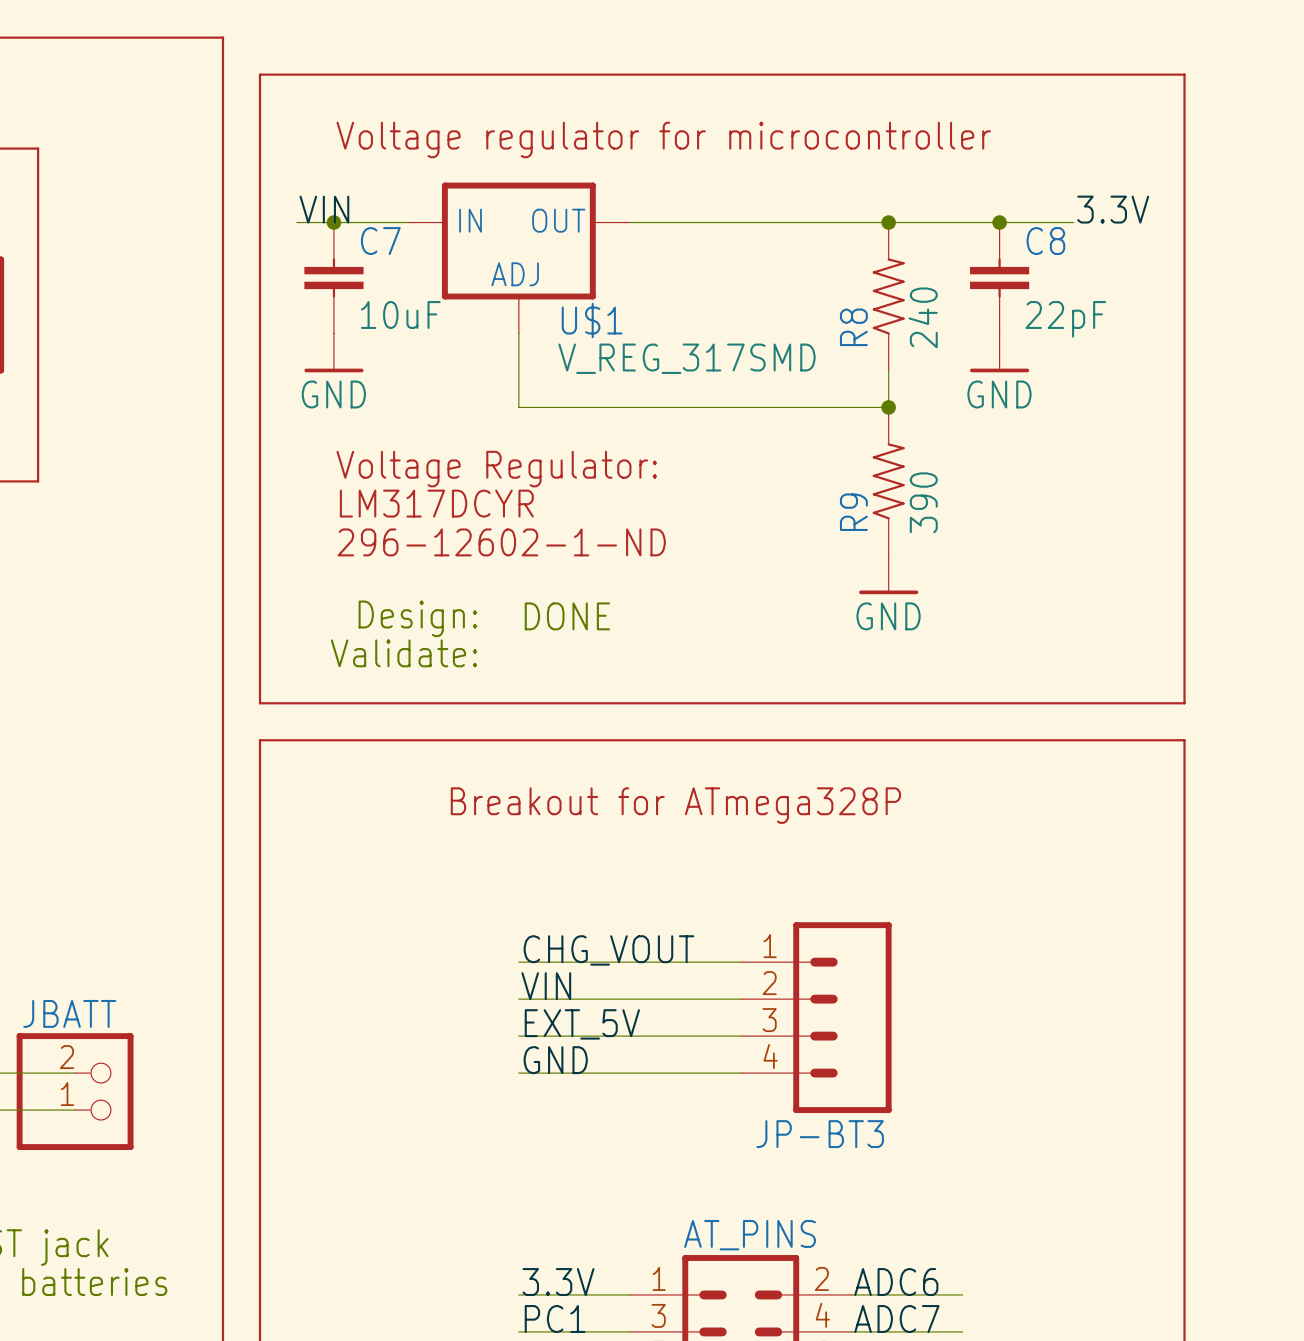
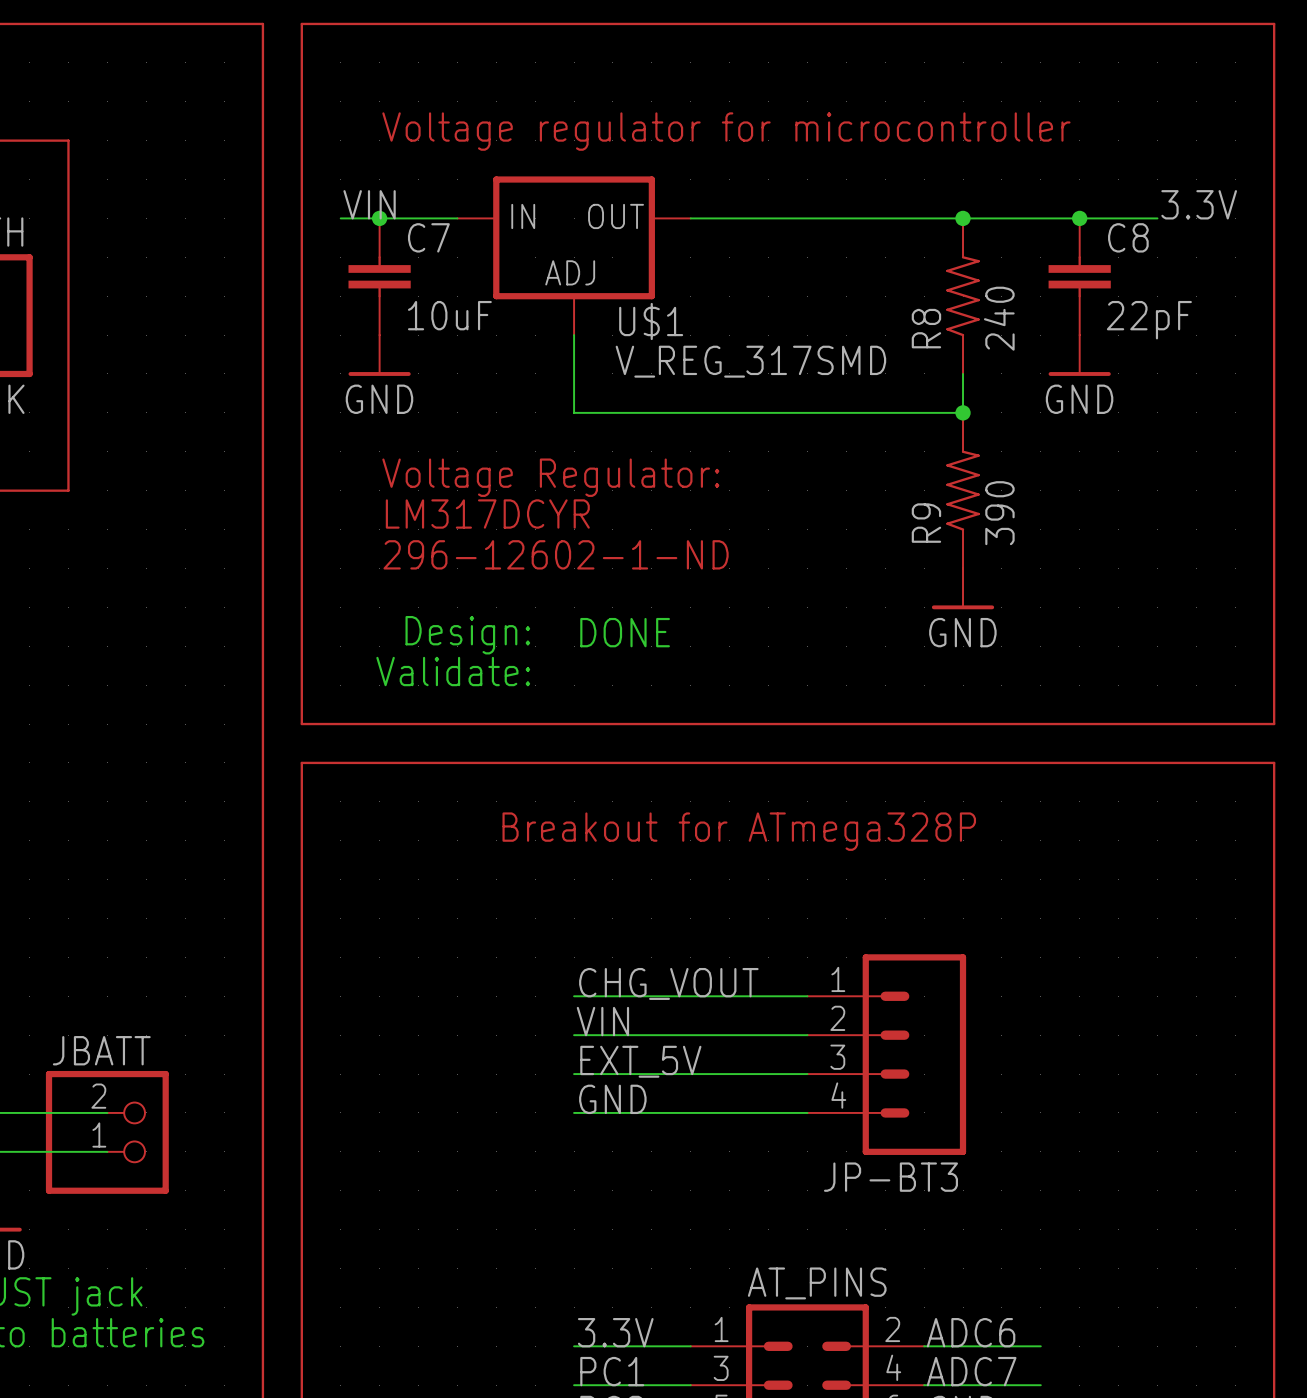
line: (259, 74) (1184, 74) -> (301, 62) (301, 23) (1274, 23) (1274, 62)

